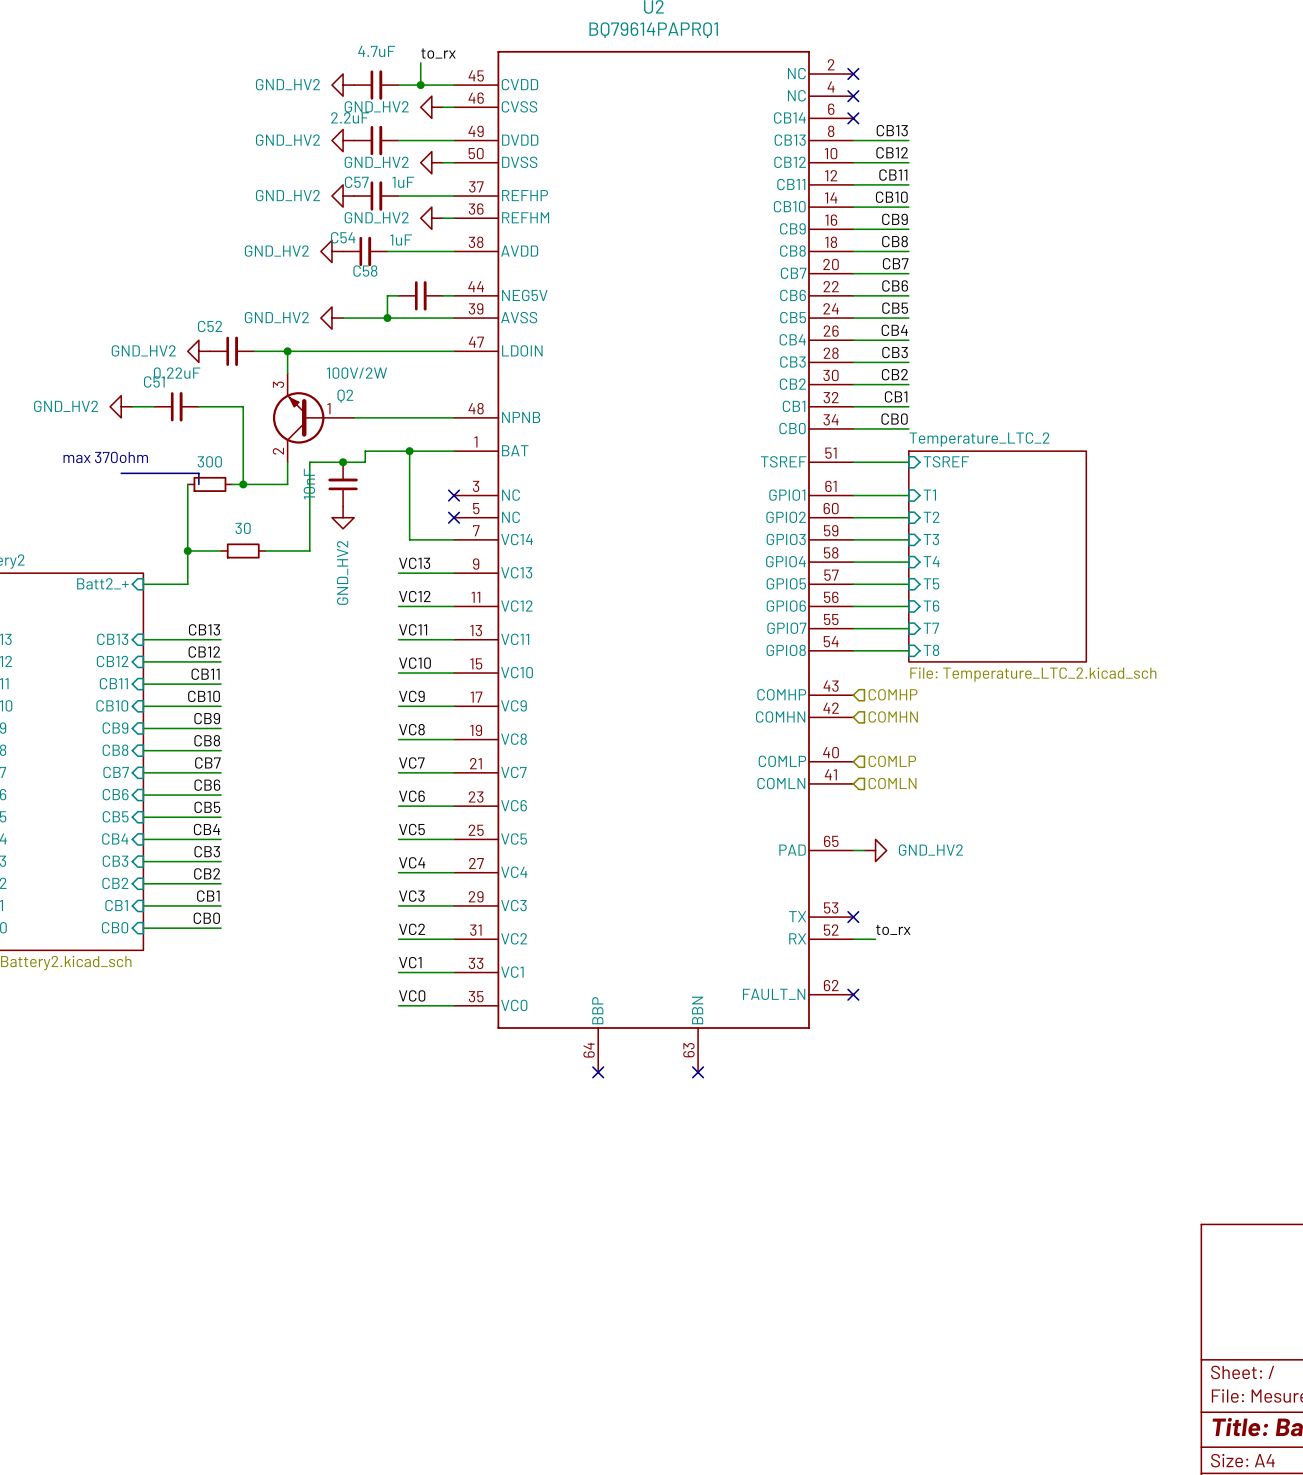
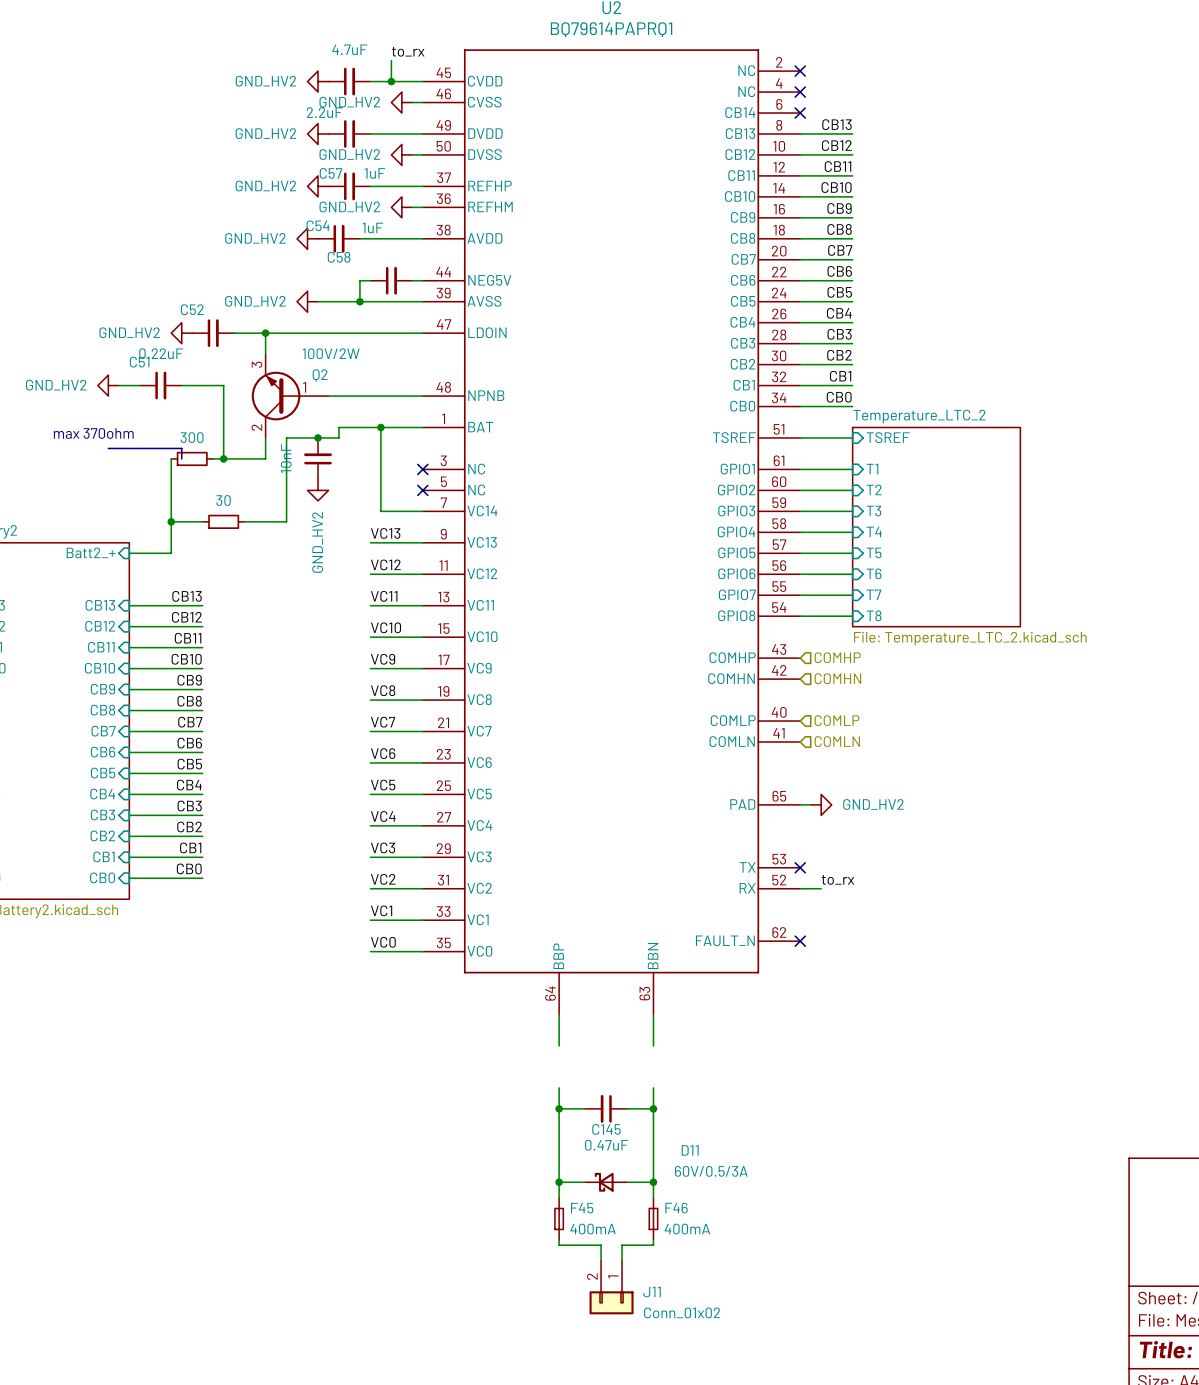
wire: none -> (559, 1014) (559, 1045)
no-connect mark: (598, 1072) -> none
wire: none -> (653, 1014) (653, 1045)
no-connect mark: (698, 1072) -> none
wire: none -> (559, 1087) (559, 1197)
wire: none -> (653, 1087) (653, 1197)
wire: none -> (559, 1108) (585, 1108)
junction: none -> (559, 1108)
C145: none -> 0.47uF (606, 1108)
wire: none -> (627, 1108) (653, 1108)
junction: none -> (653, 1108)
wire: none -> (559, 1182) (585, 1182)
junction: none -> (559, 1182)
D11: none -> 60V/0.5/3A (606, 1182)
wire: none -> (627, 1182) (653, 1182)
junction: none -> (653, 1182)
F45: none -> 400mA (559, 1218)
F46: none -> 400mA (653, 1218)
wire: none -> (559, 1239) (559, 1245) (601, 1245) (601, 1260)
wire: none -> (653, 1239) (653, 1245) (622, 1245) (622, 1260)
J11: none -> Conn_01x02 (611, 1287)

